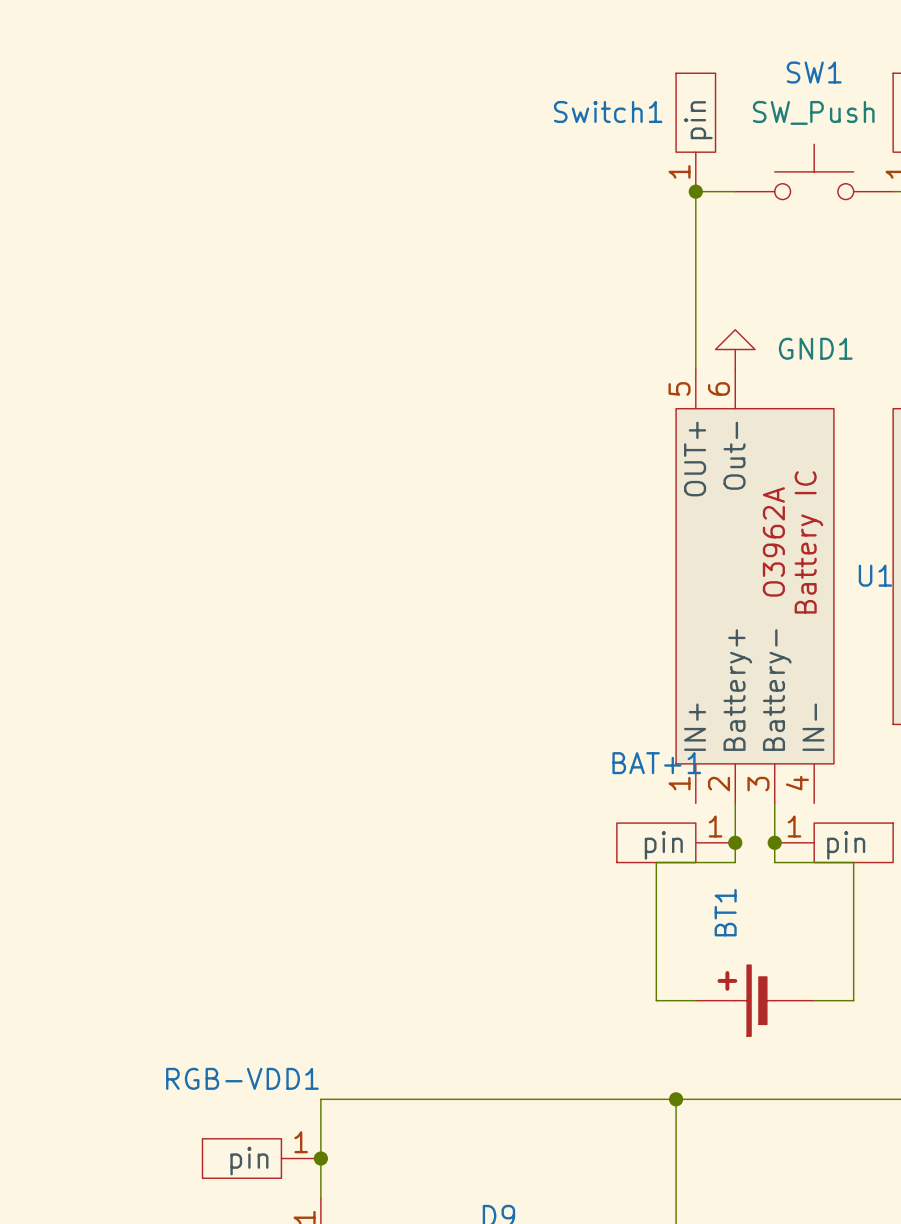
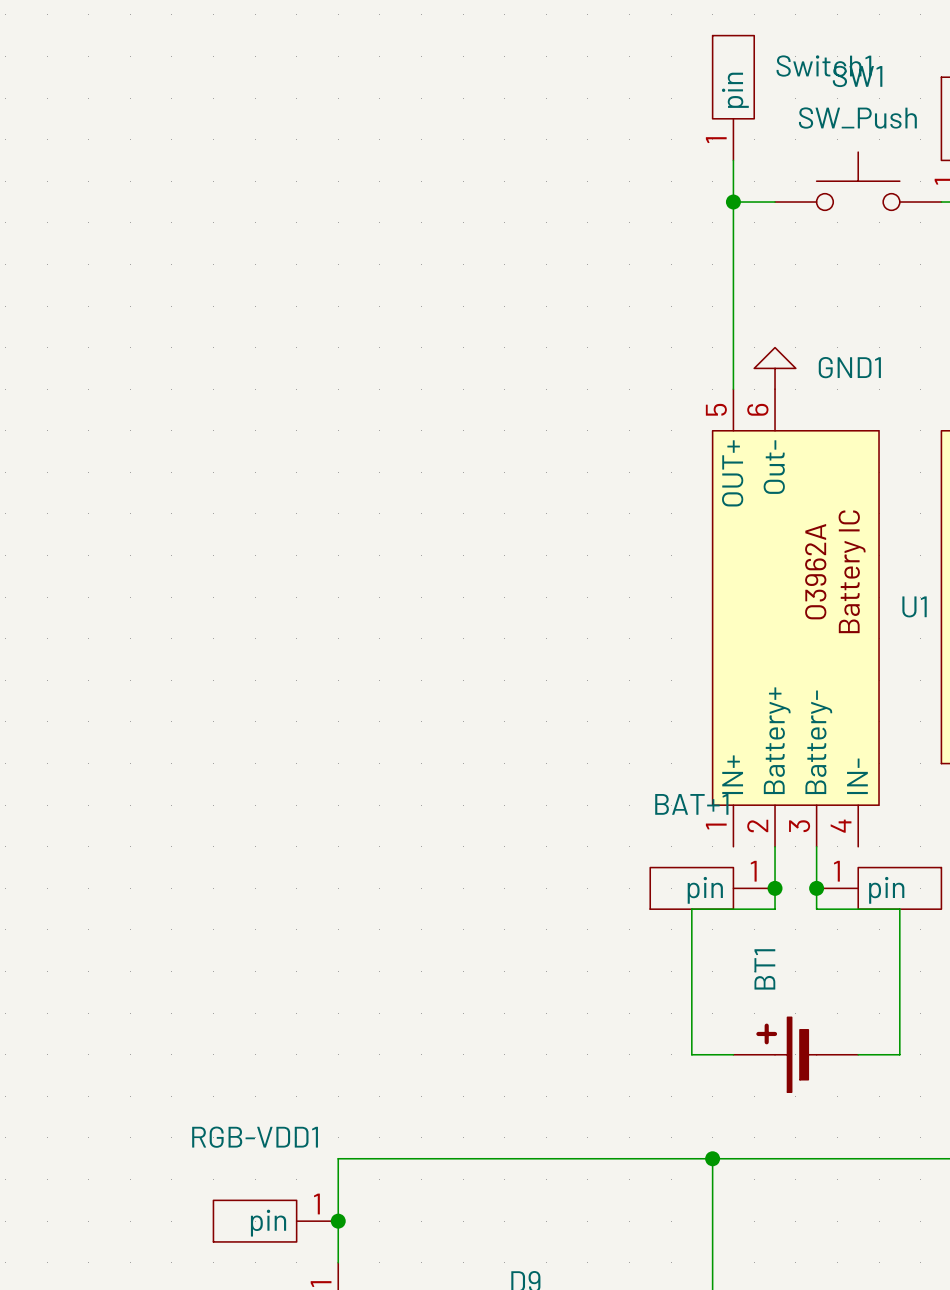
Switch1 name position: Switch1 (608, 111) -> Switch1 (823, 66)
Switch1 position: (695, 132) -> (733, 98)

